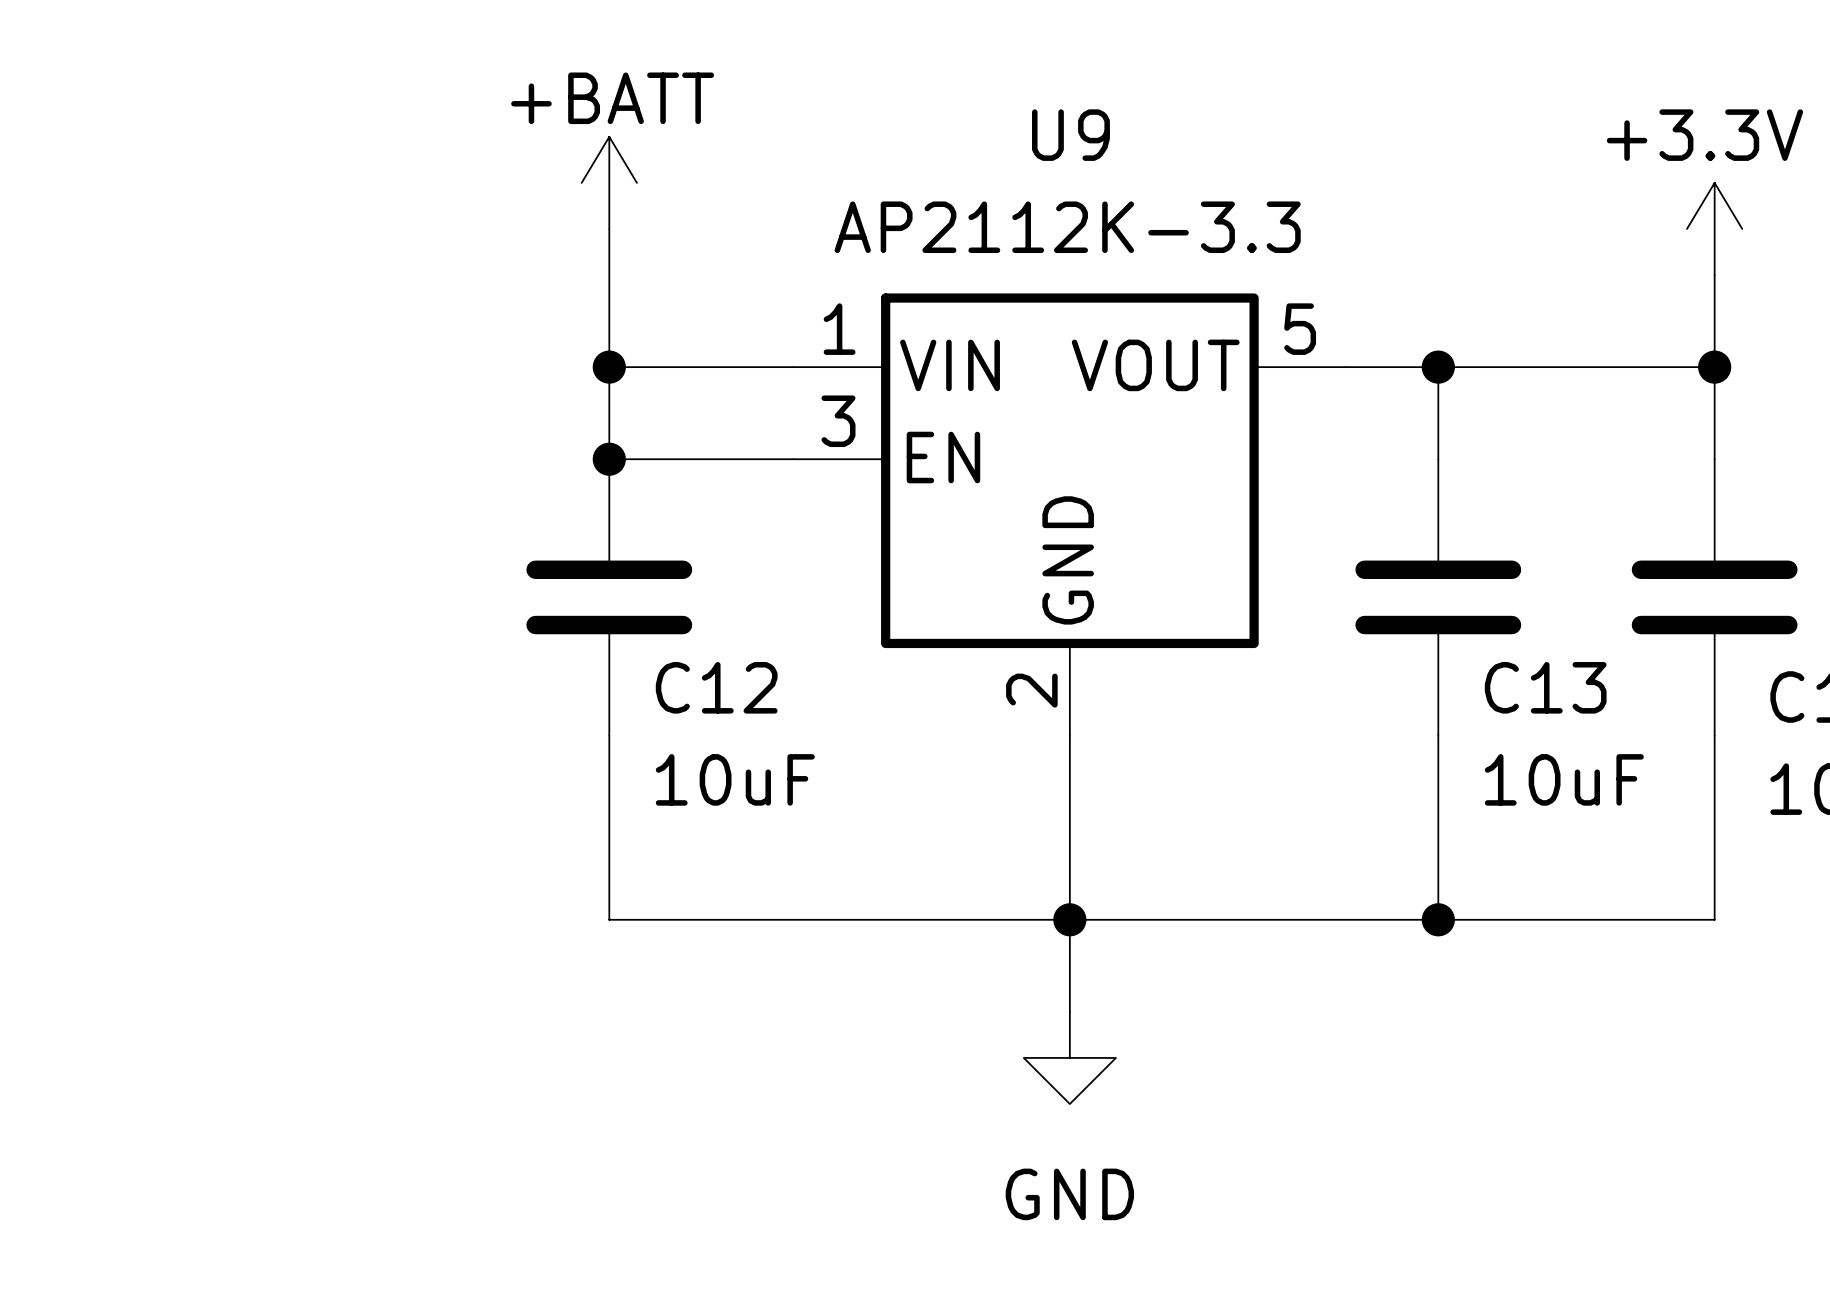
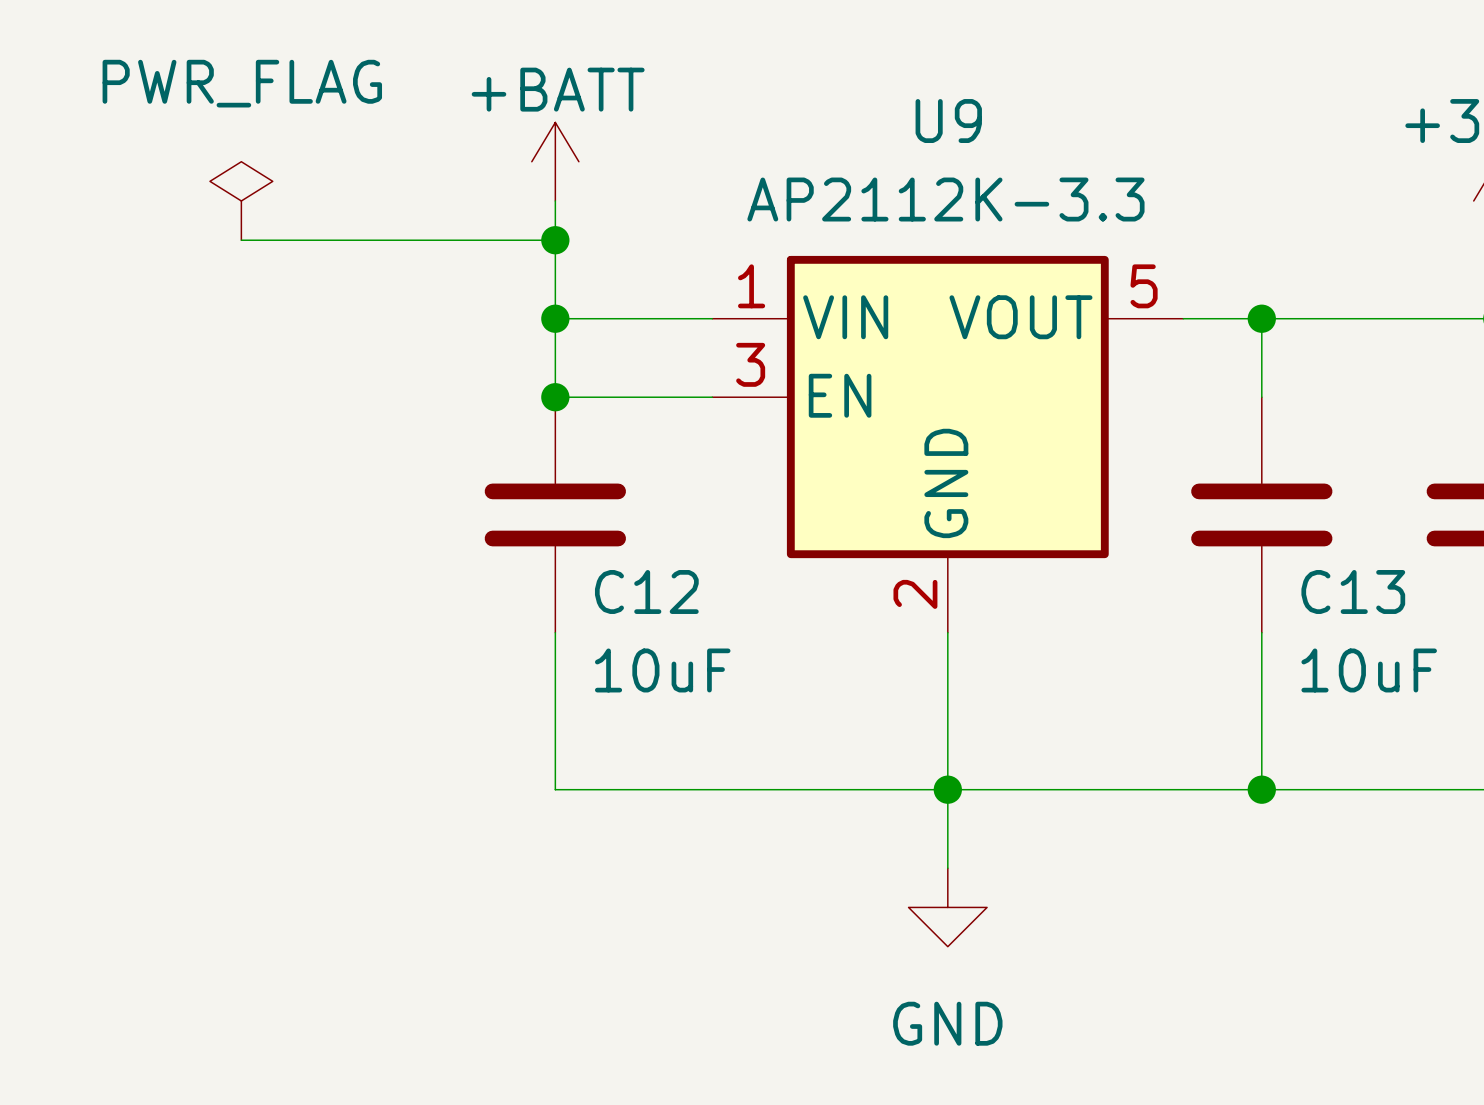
power symbol: none -> PWR_FLAG (241, 200)
wire: none -> (241, 240) (555, 240)
junction: none -> (555, 240)

